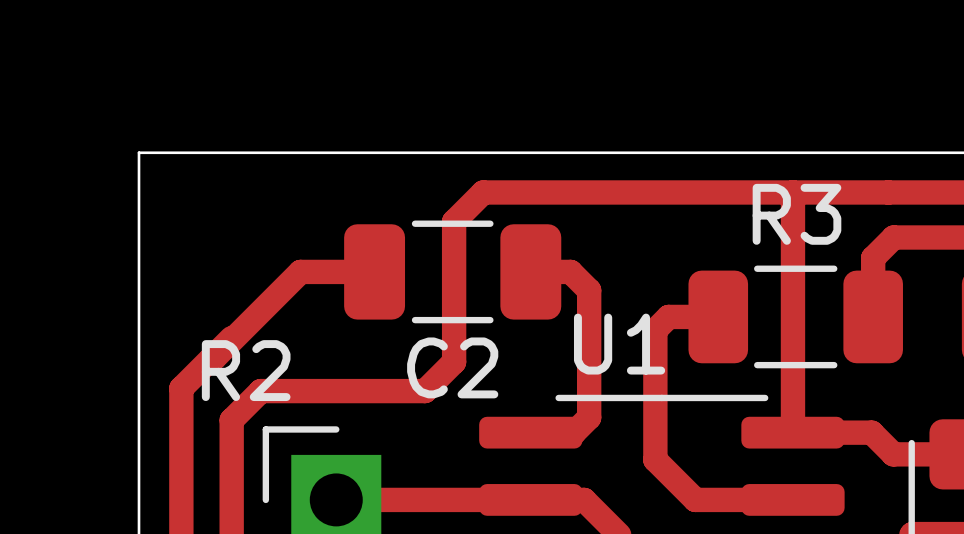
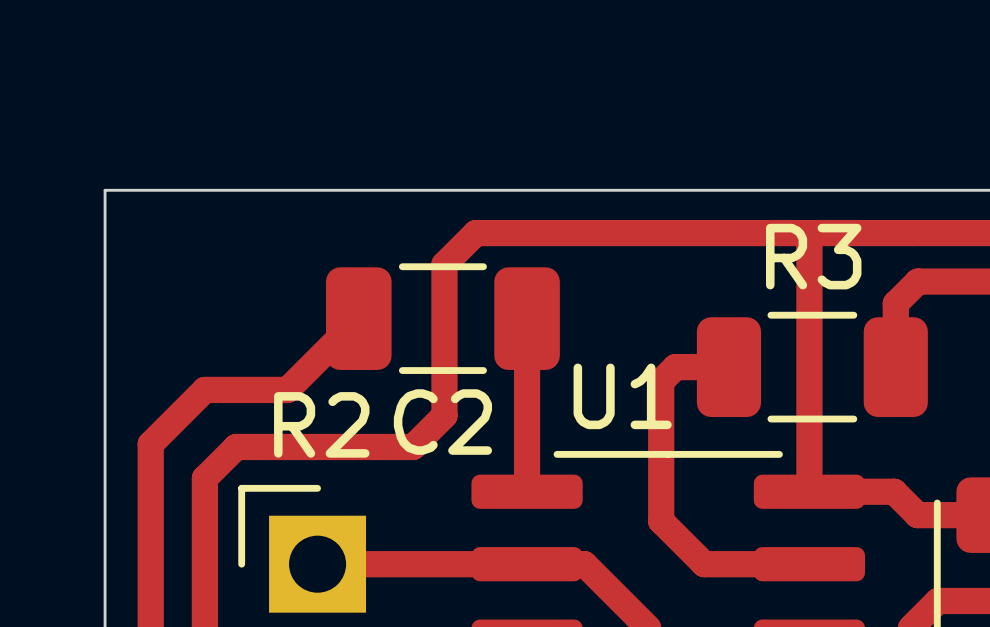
top track: (374, 271) (300, 271) (214, 357) (211, 357) -> (358, 318) (287, 389) (204, 389)
top track: (530, 271) (570, 271) (589, 290) (589, 417) (574, 432) (530, 432) -> (527, 318) (527, 491)
R2 name position: R2 (246, 370) -> R2 (321, 424)

